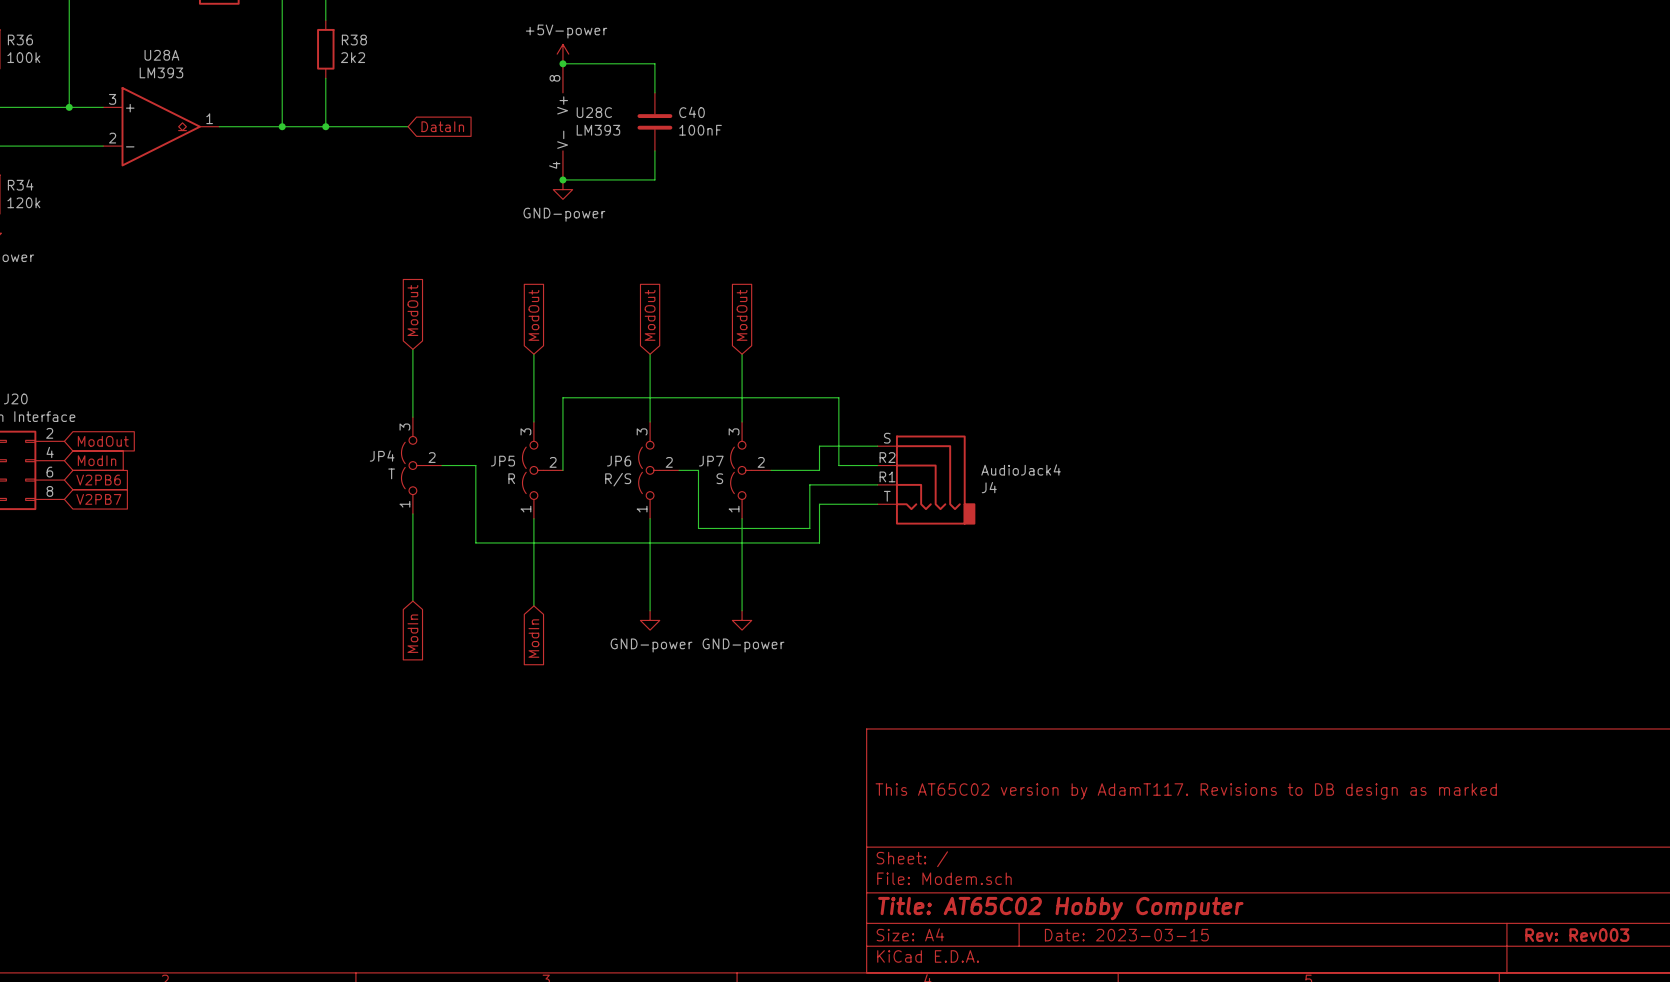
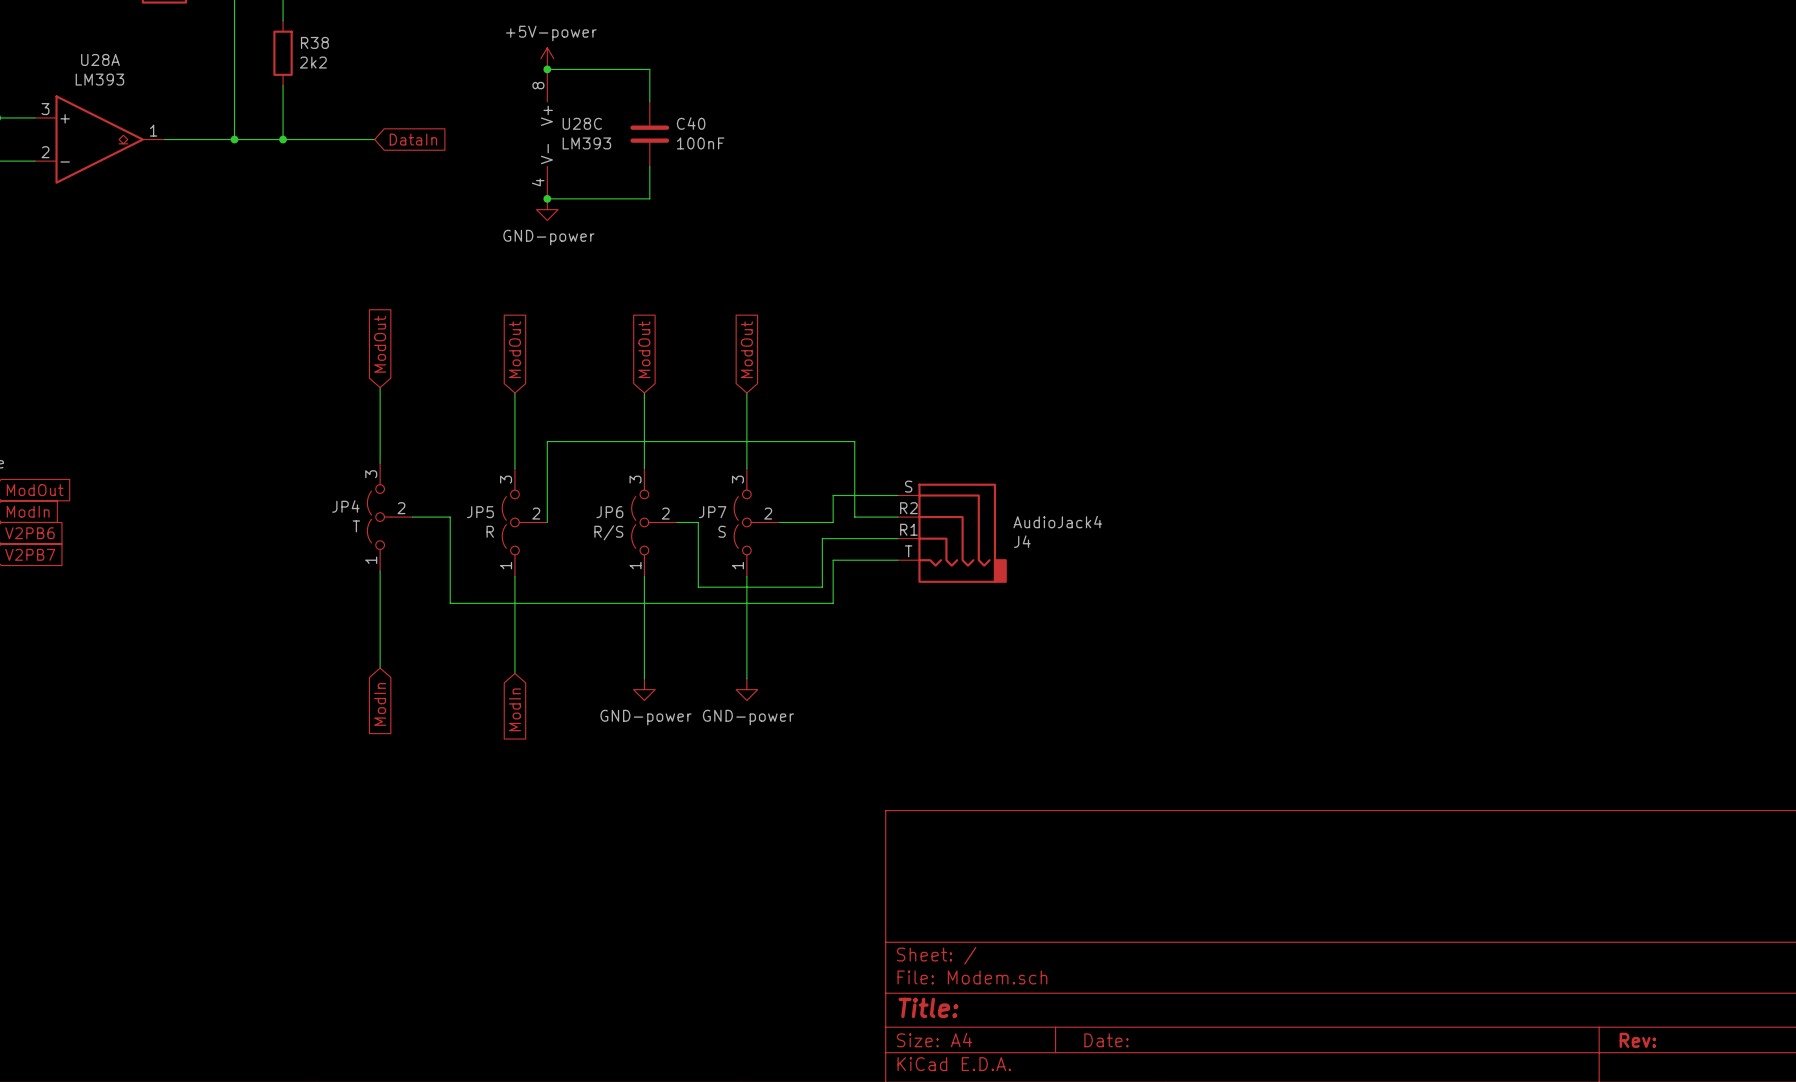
title block: This AT65C02 version by AdamT117. Revisions to DB design as marked (1186, 791) -> none
title block: Title: AT65C02 Hobby Computer (1060, 908) -> Title: (928, 1007)
title block: Date: 2023-03-15 (1126, 935) -> Date: (1106, 1040)
title block: Rev: Rev003 (1577, 935) -> Rev: (1637, 1040)

